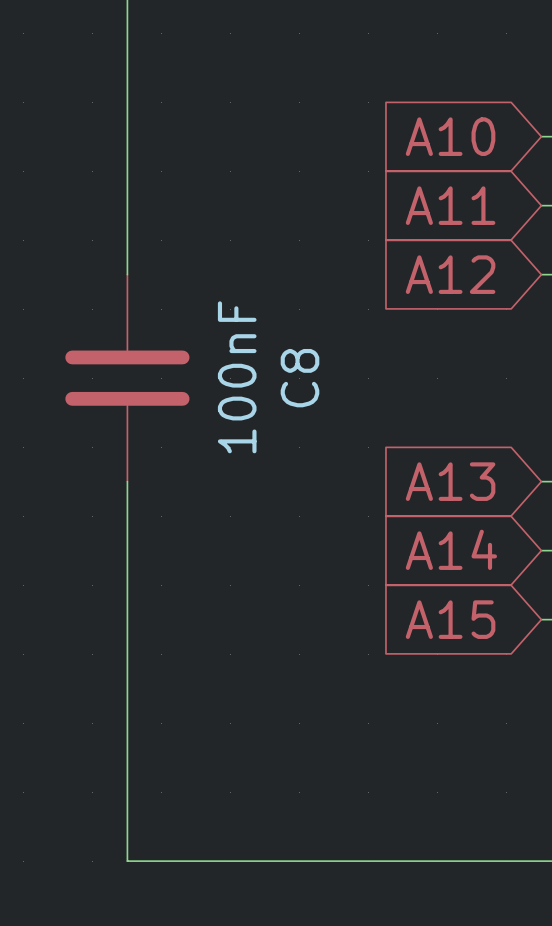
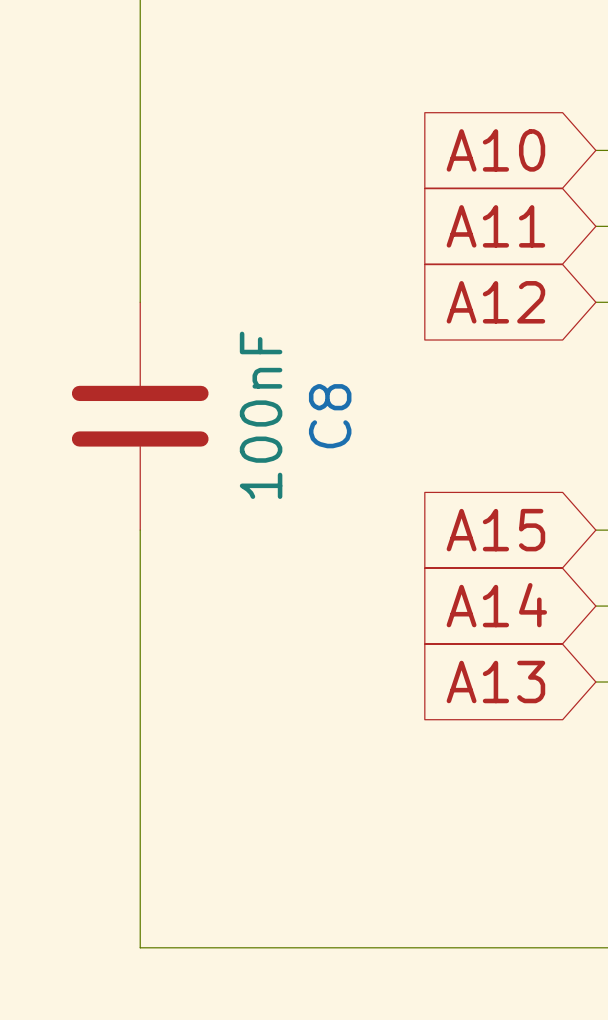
global label: A13 (450, 481) -> A15 (495, 530)
global label: A15 (450, 619) -> A13 (495, 682)

